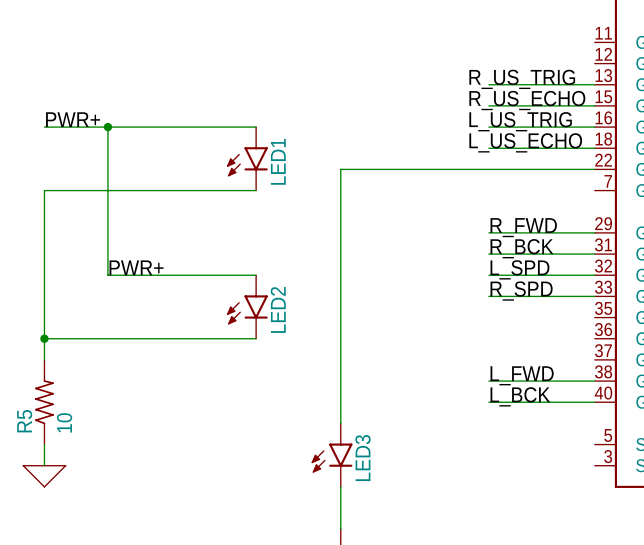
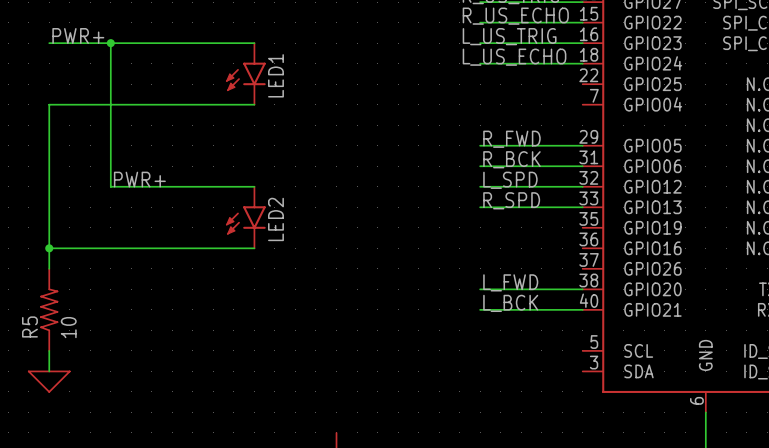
wire: (594, 169) (340, 169) (340, 423) -> none
LED3: (331, 455) -> none
wire: (340, 486) (340, 529) -> none

